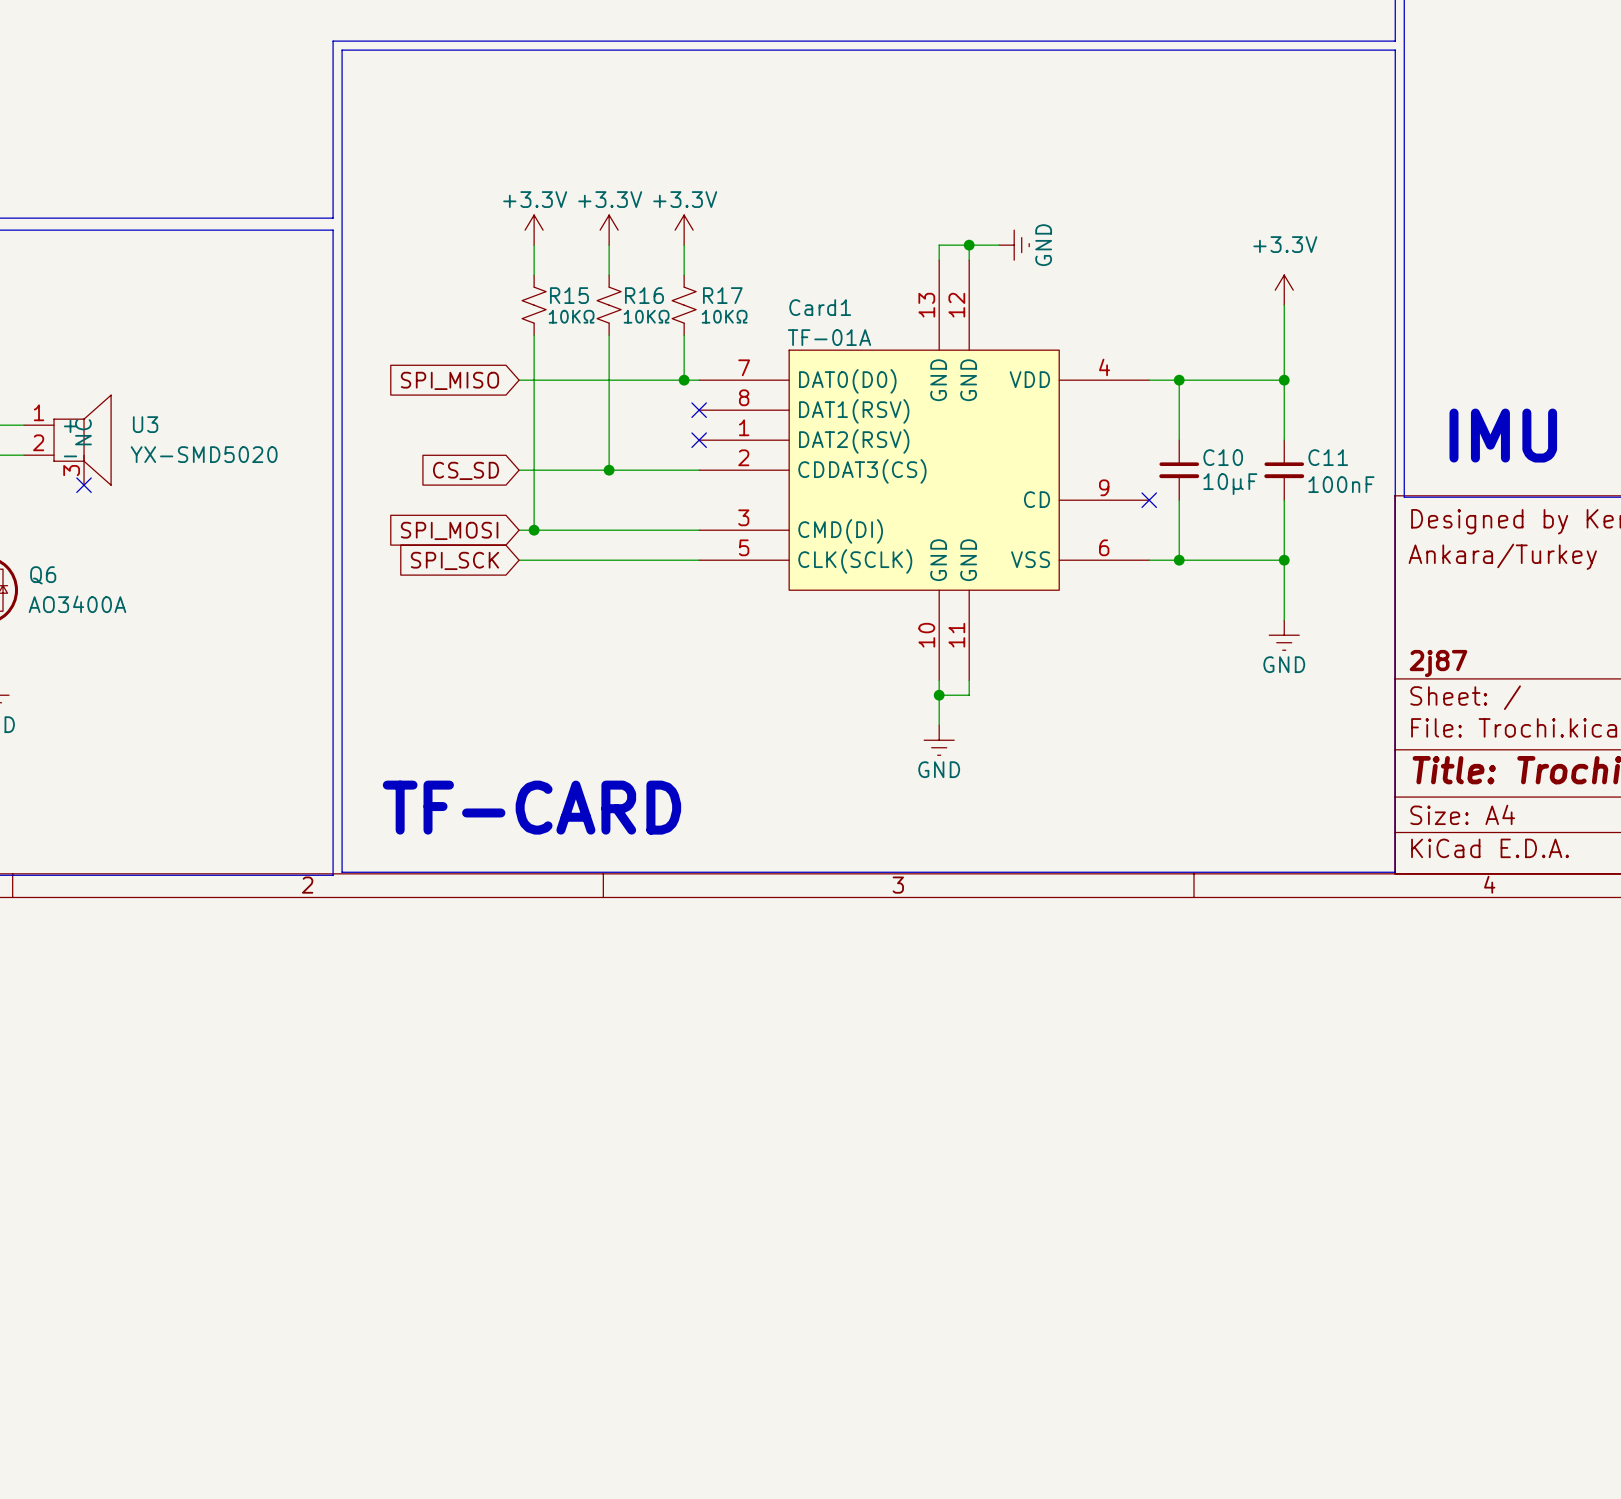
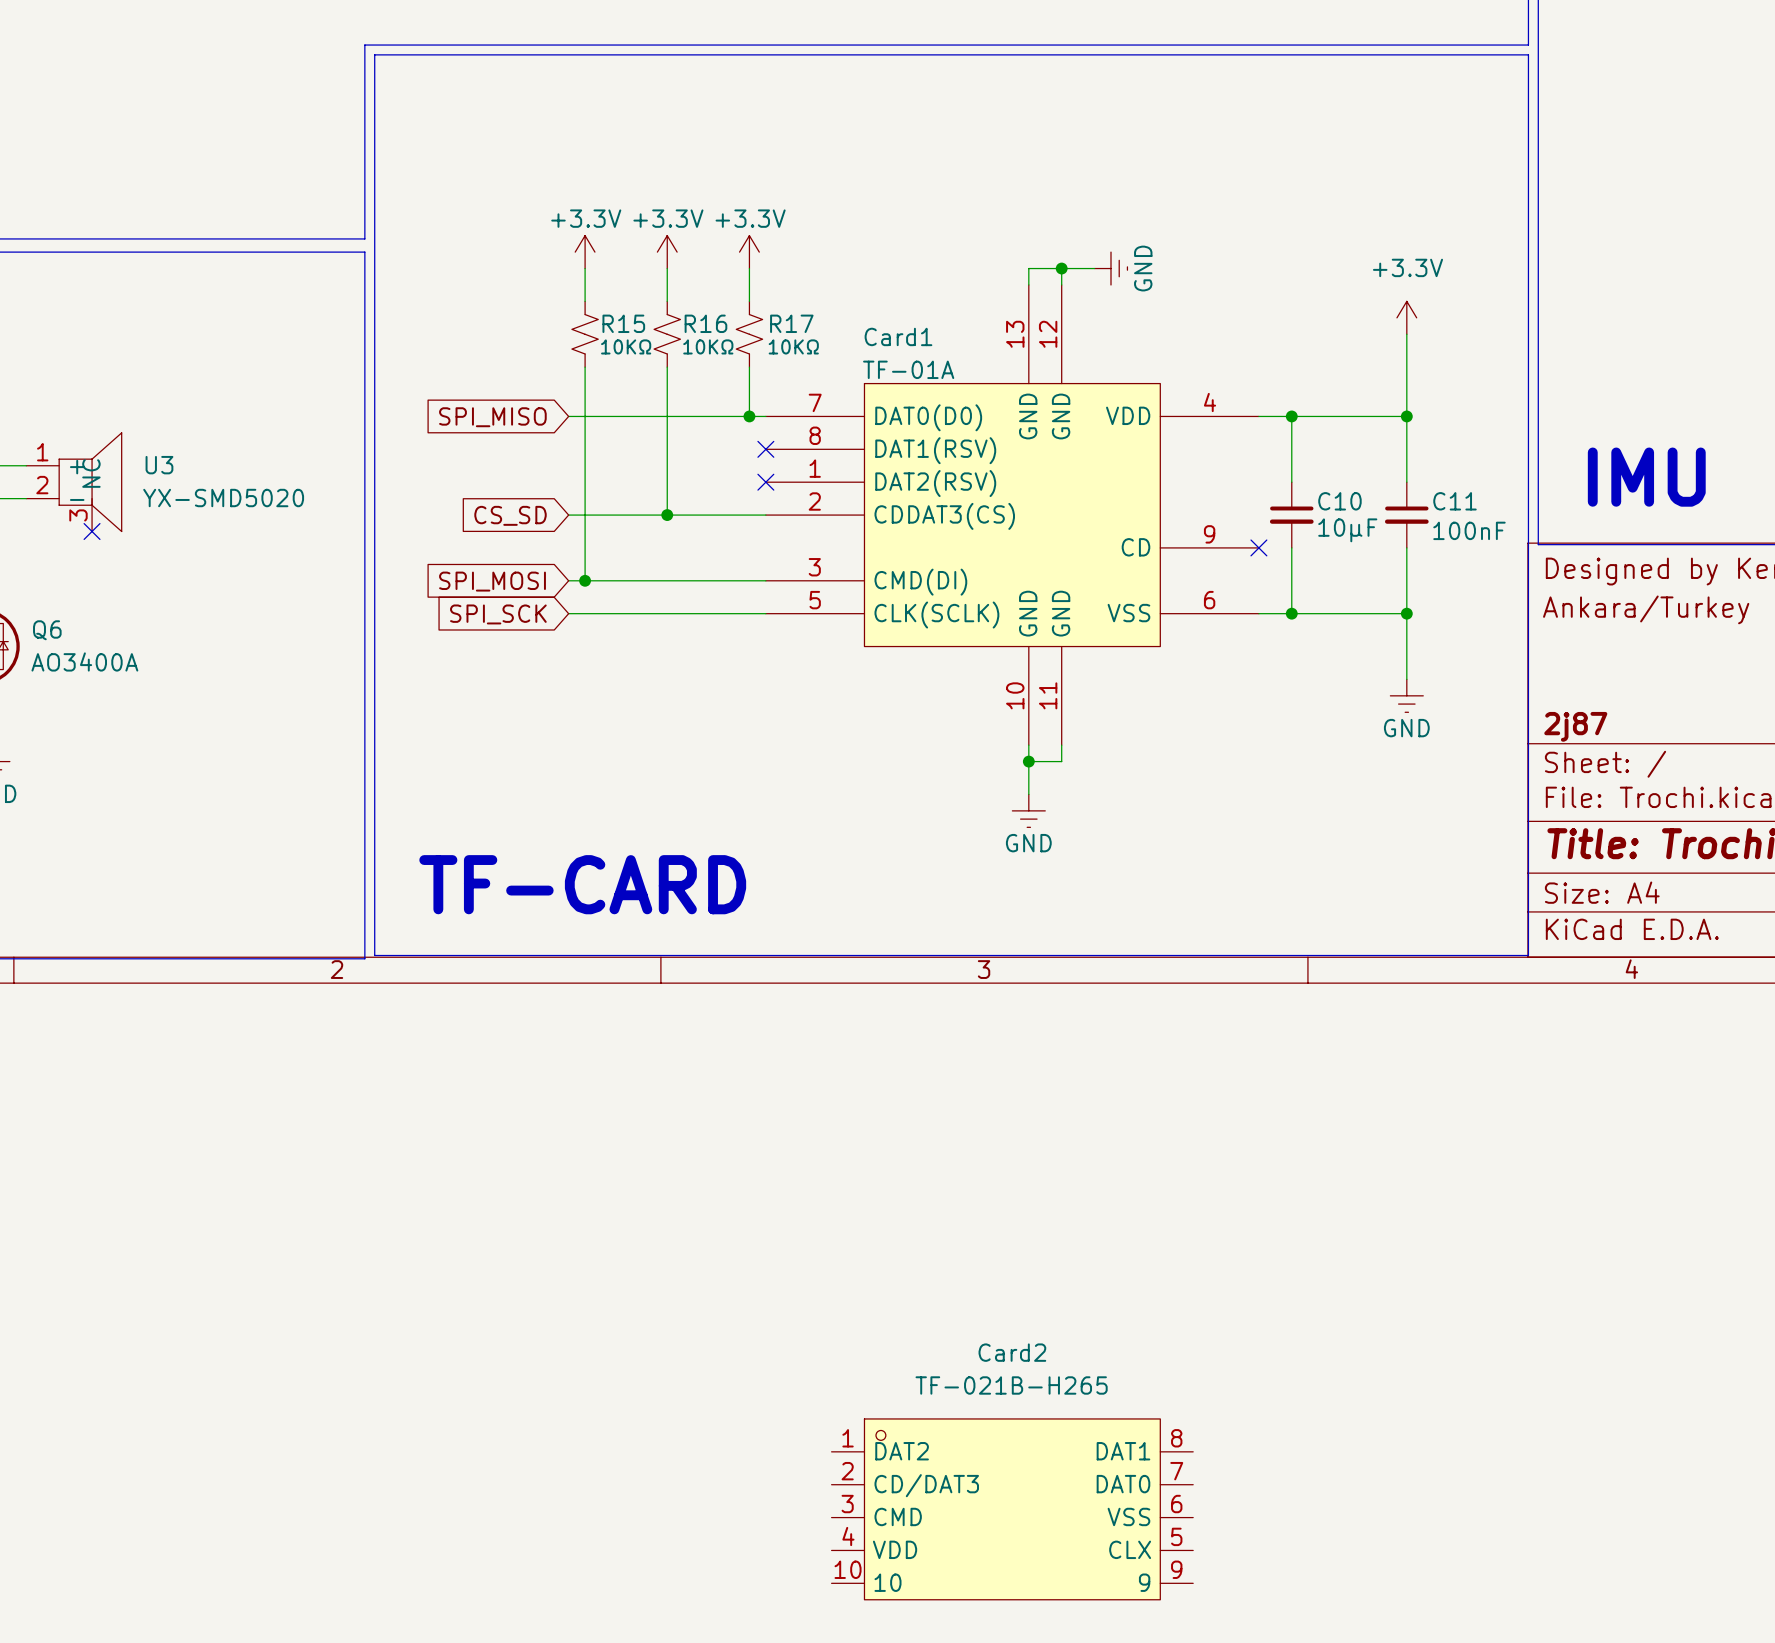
Card2: none -> TF-021B-H265 (1012, 1509)

